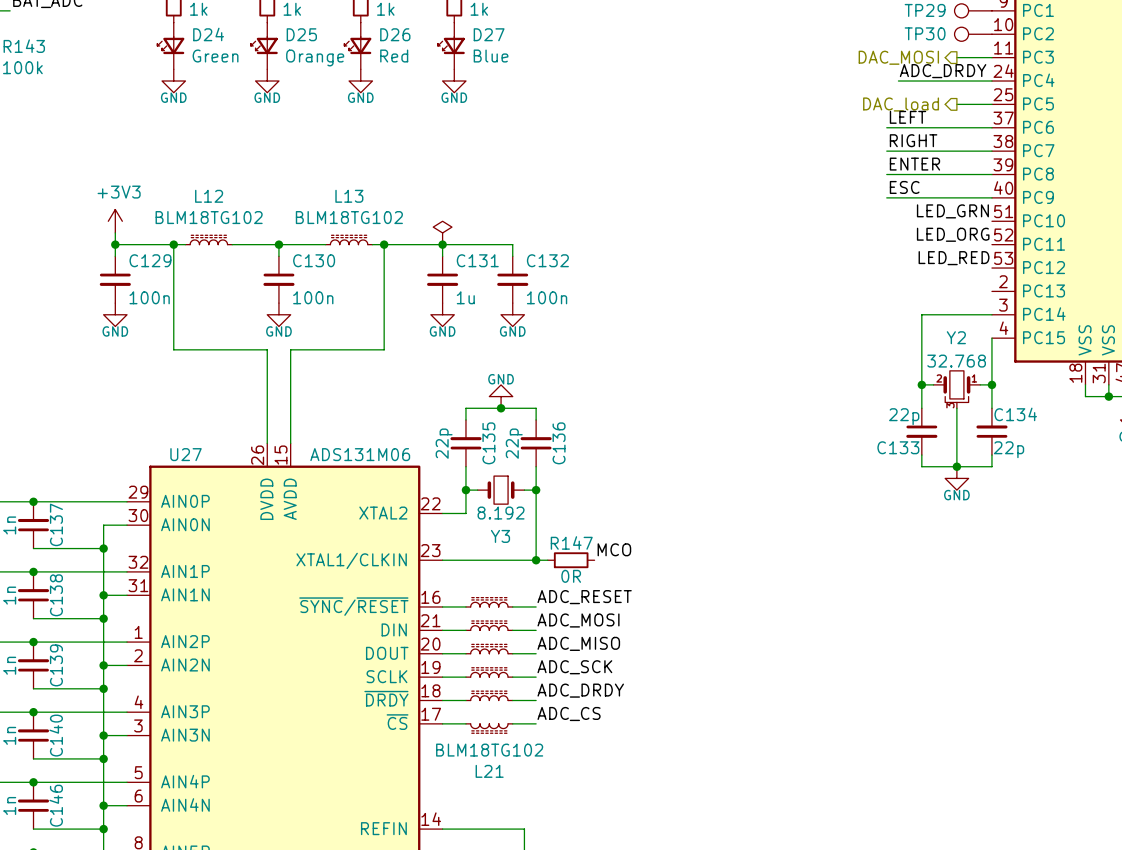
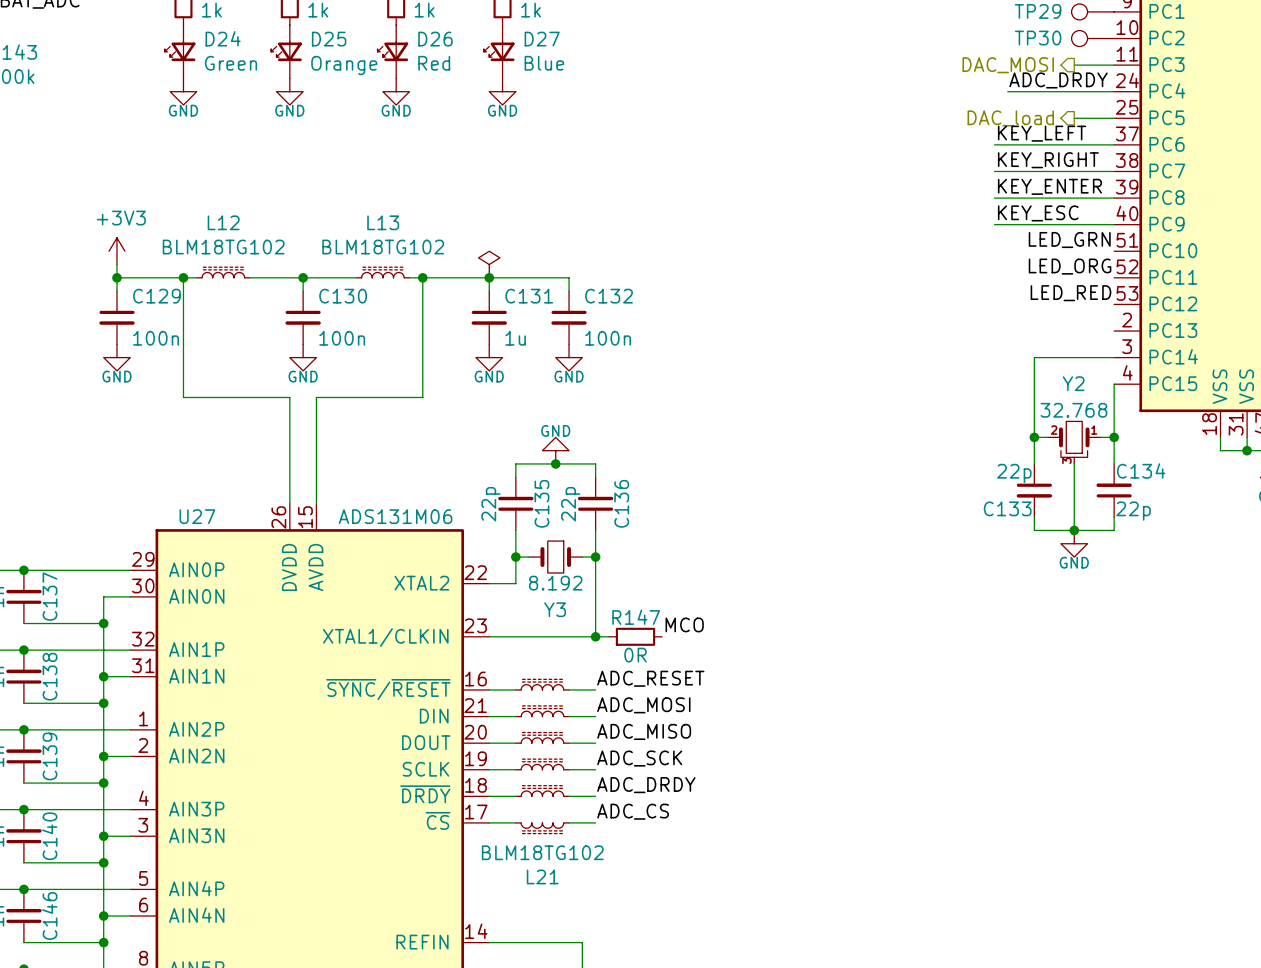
label: LEFT (908, 117) -> KEY_LEFT (1042, 133)
label: RIGHT (913, 140) -> KEY_RIGHT (1048, 160)
label: ENTER (914, 164) -> KEY_ENTER (1049, 186)
label: ESC (904, 187) -> KEY_ESC (1038, 213)

